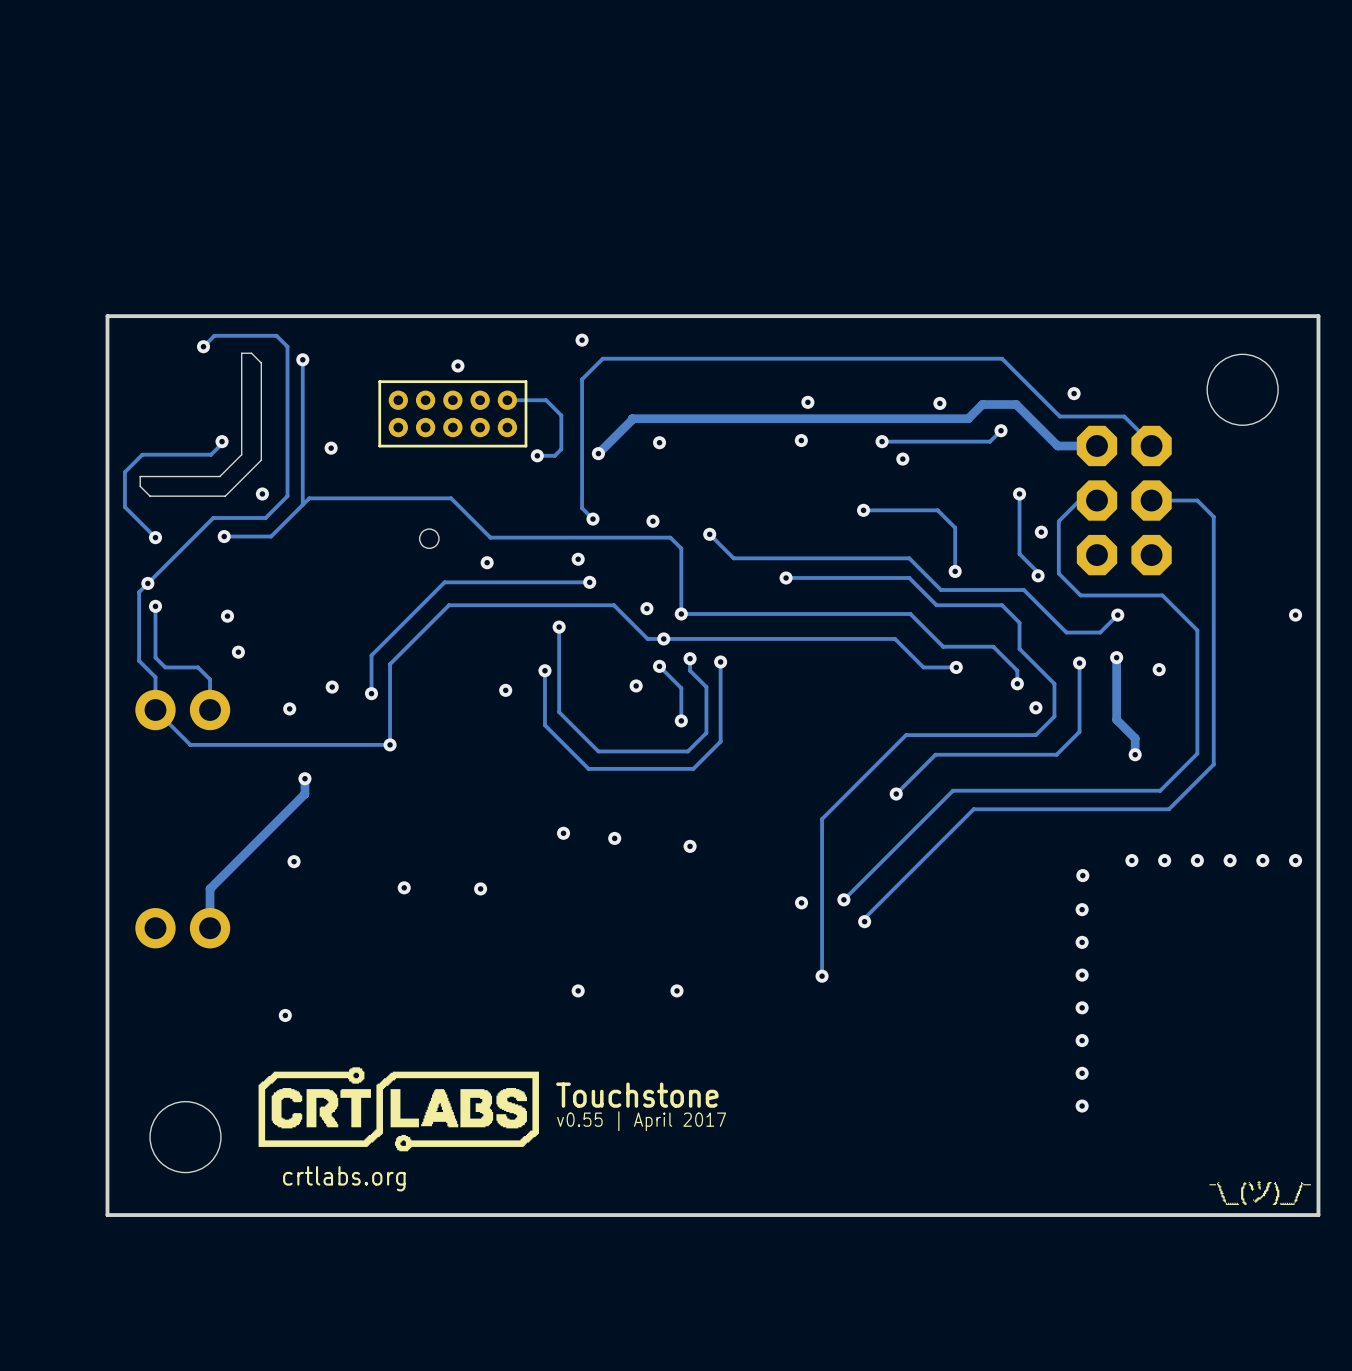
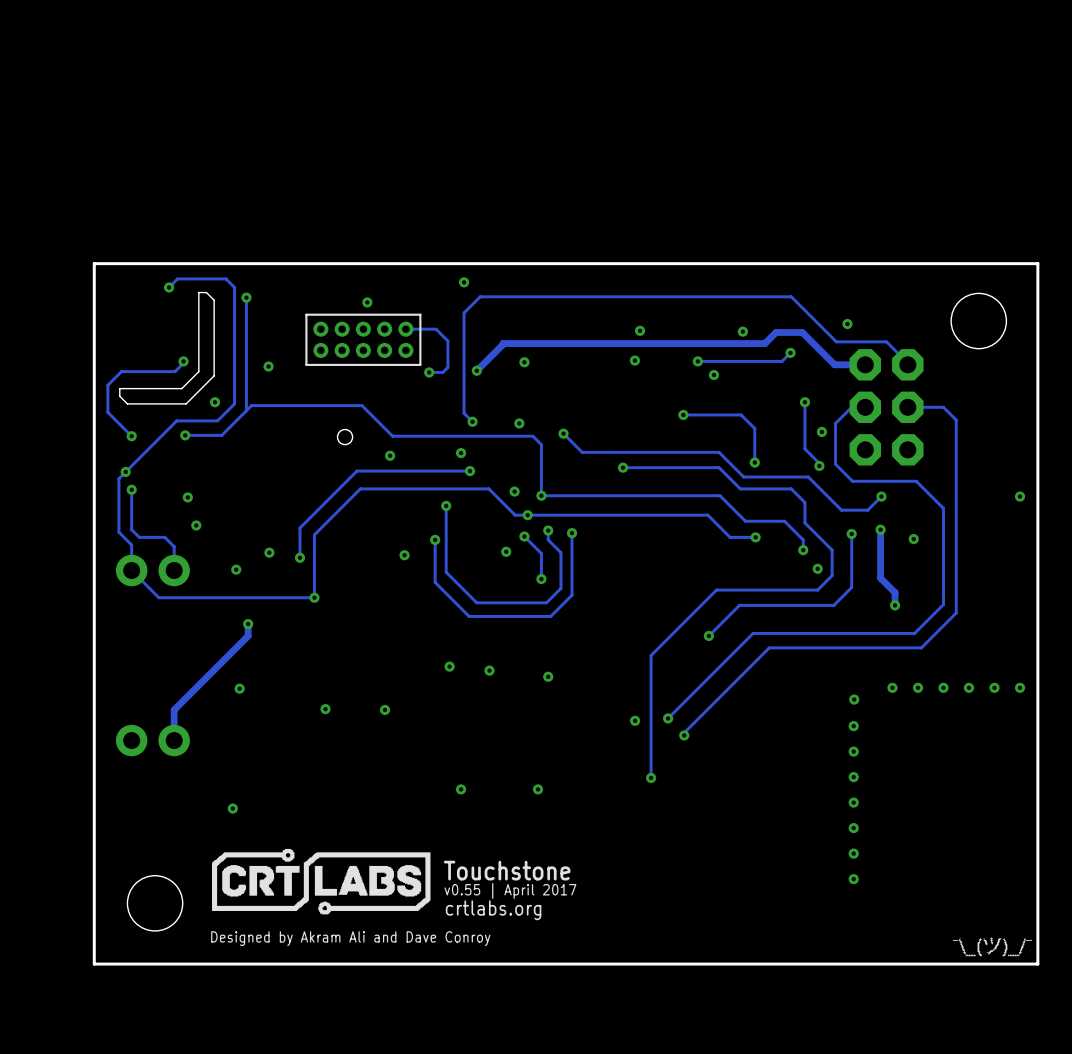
text position: crtlabs.org (344, 1178) -> crtlabs.org (493, 910)
text: none -> Designed by Akram Ali and Dave Conroy (350, 938)

